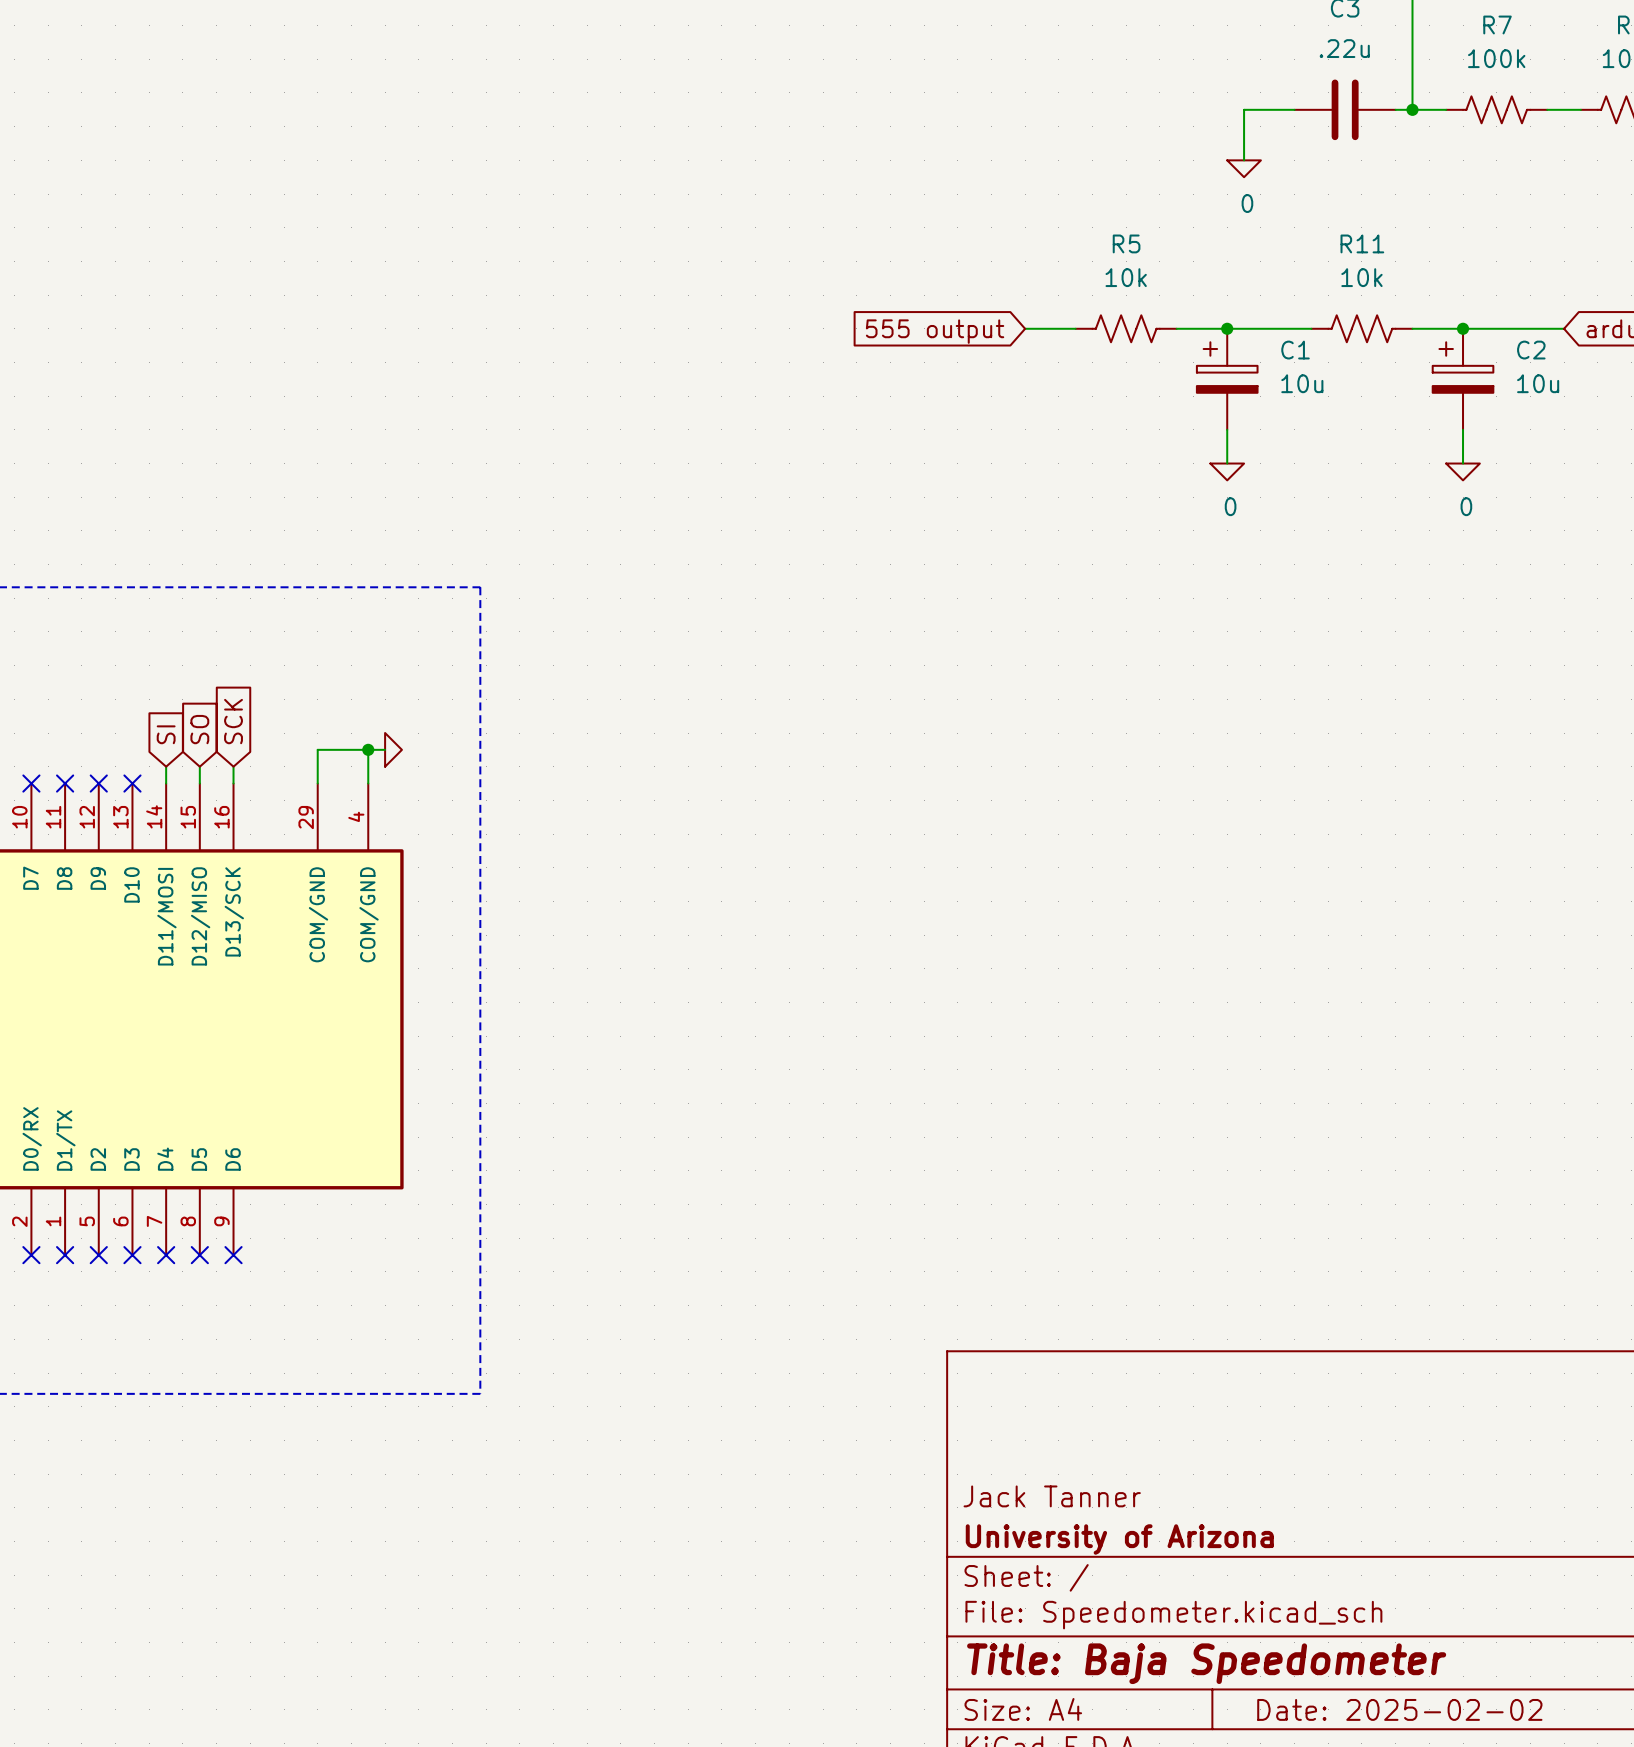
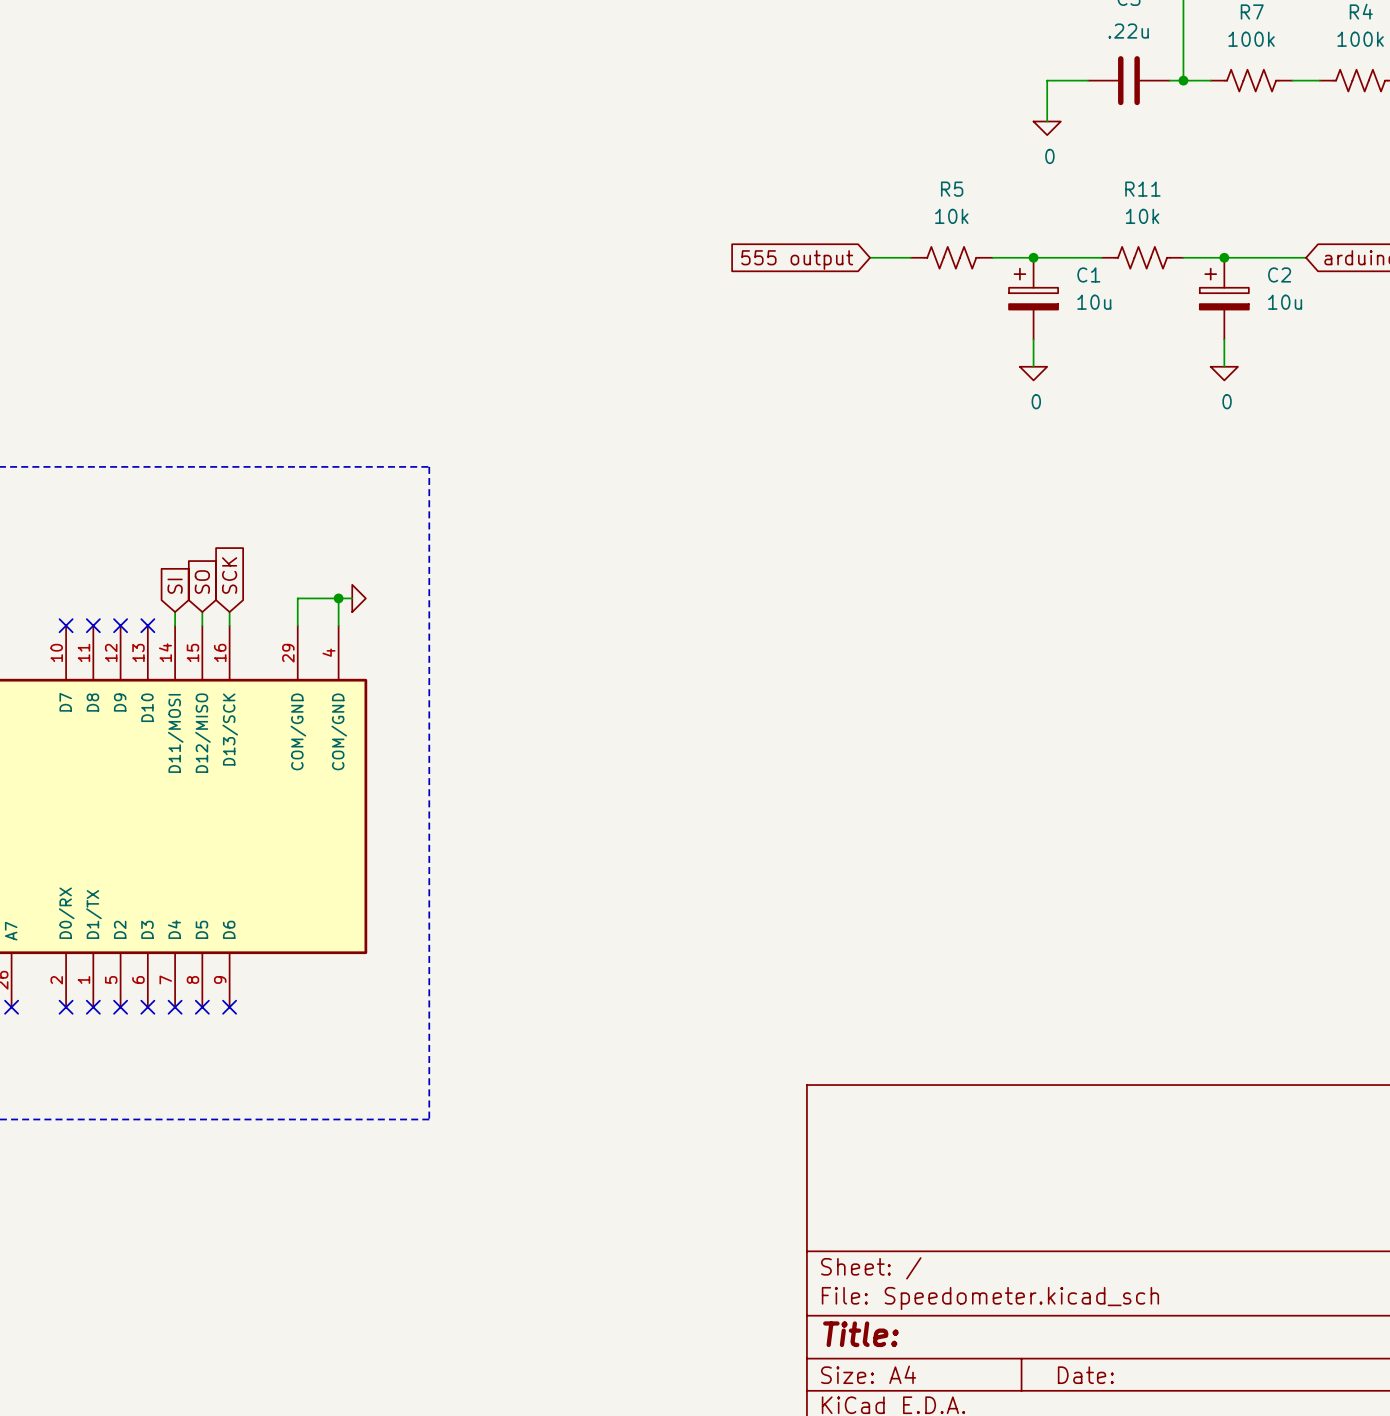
title block: Jack Tanner (1052, 1496) -> none
title block: University of Arizona (1119, 1539) -> none
title block: Title: Baja Speedometer (1206, 1663) -> Title: (860, 1334)
title block: Date: 2025-02-02 (1399, 1709) -> Date: (1085, 1375)

